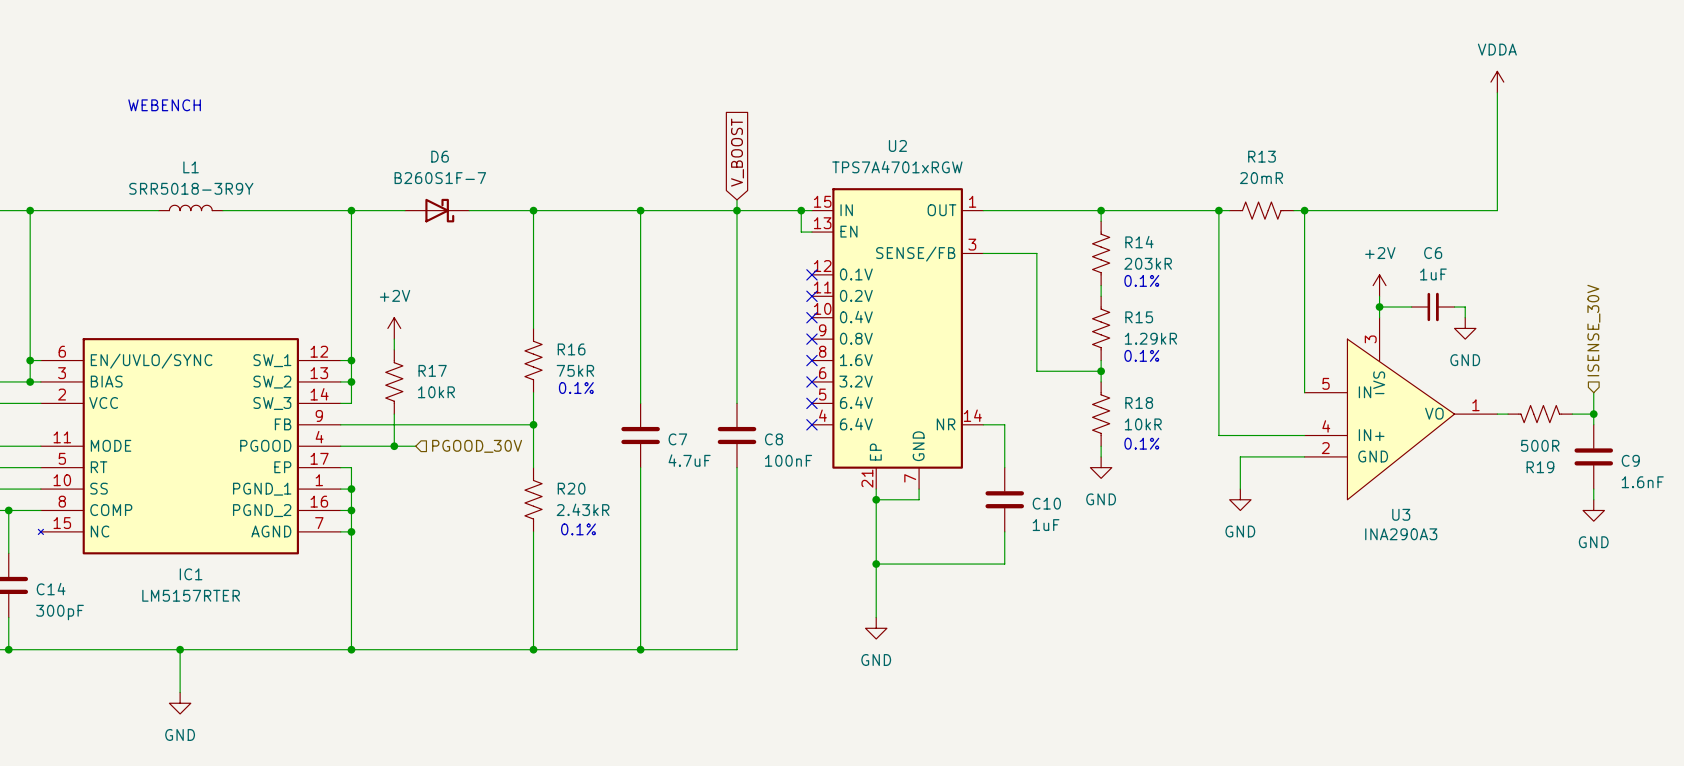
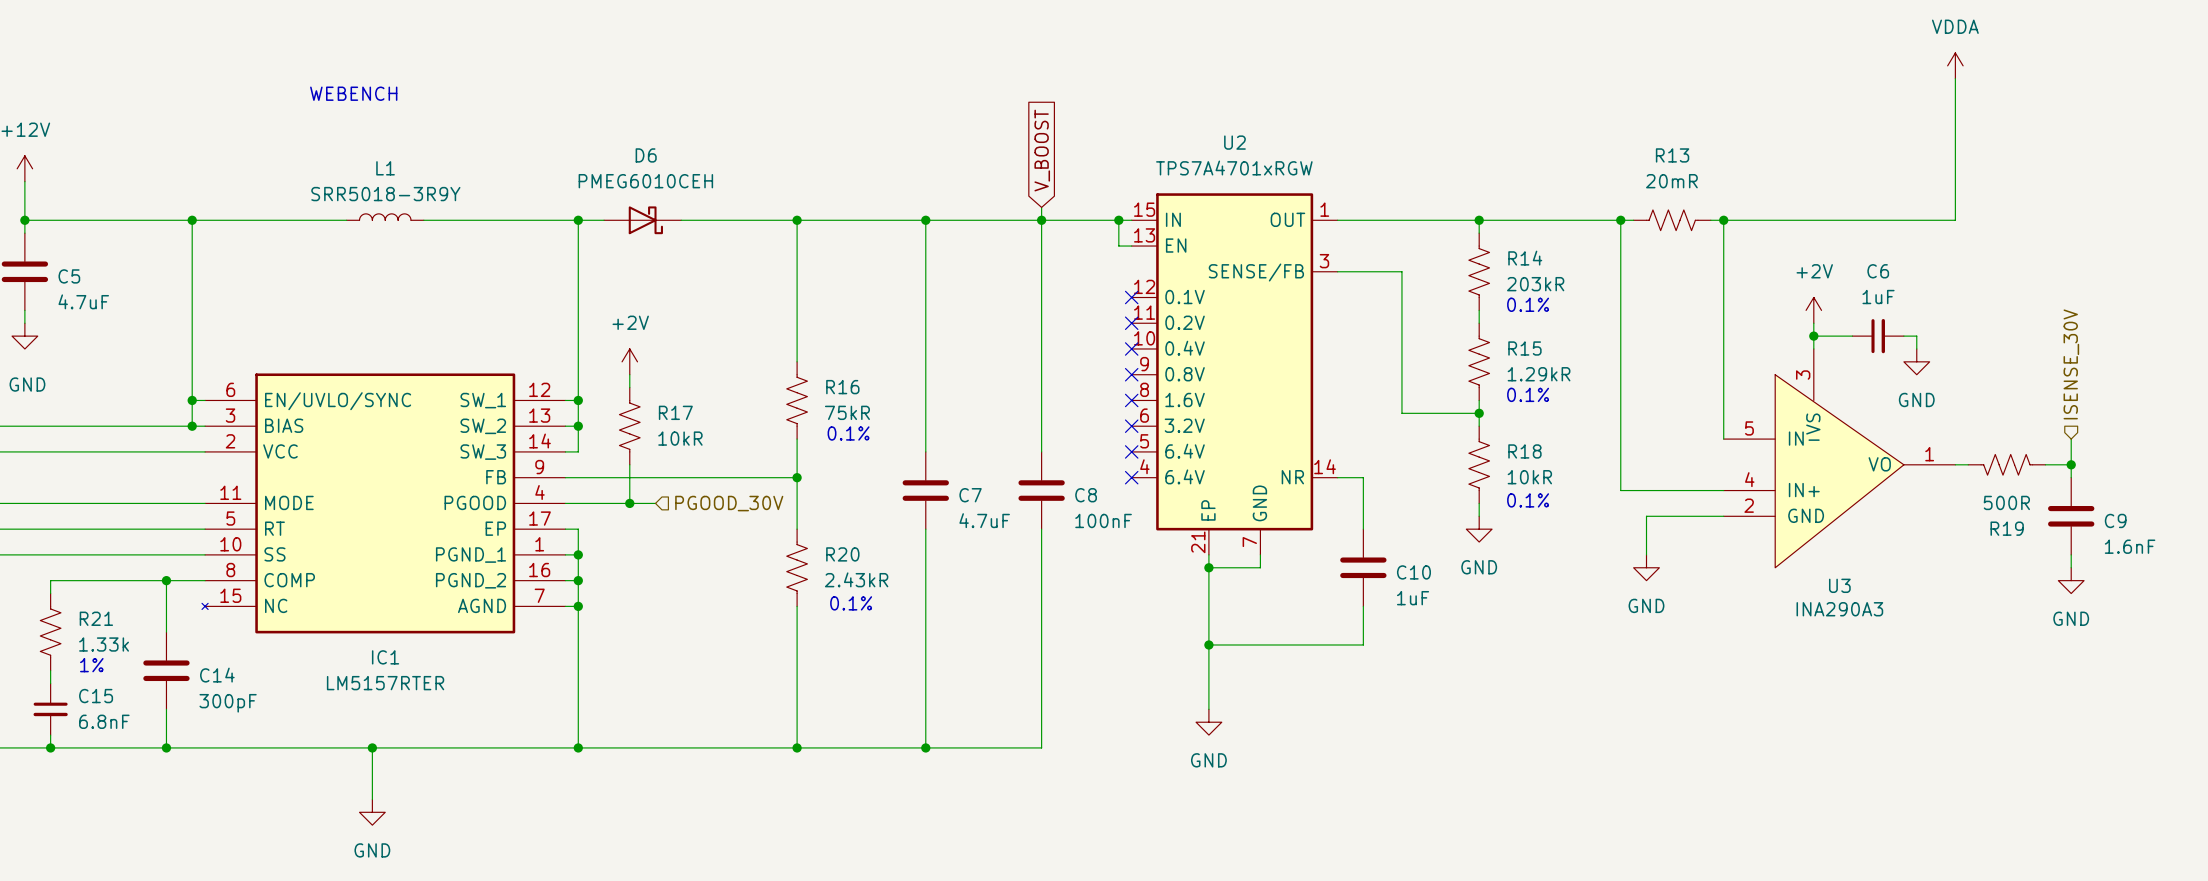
D6 value: B260S1F-7 (440, 178) -> PMEG6010CEH (645, 181)
D6 symbol: [405, 198, 470, 223] -> [604, 206, 682, 235]

